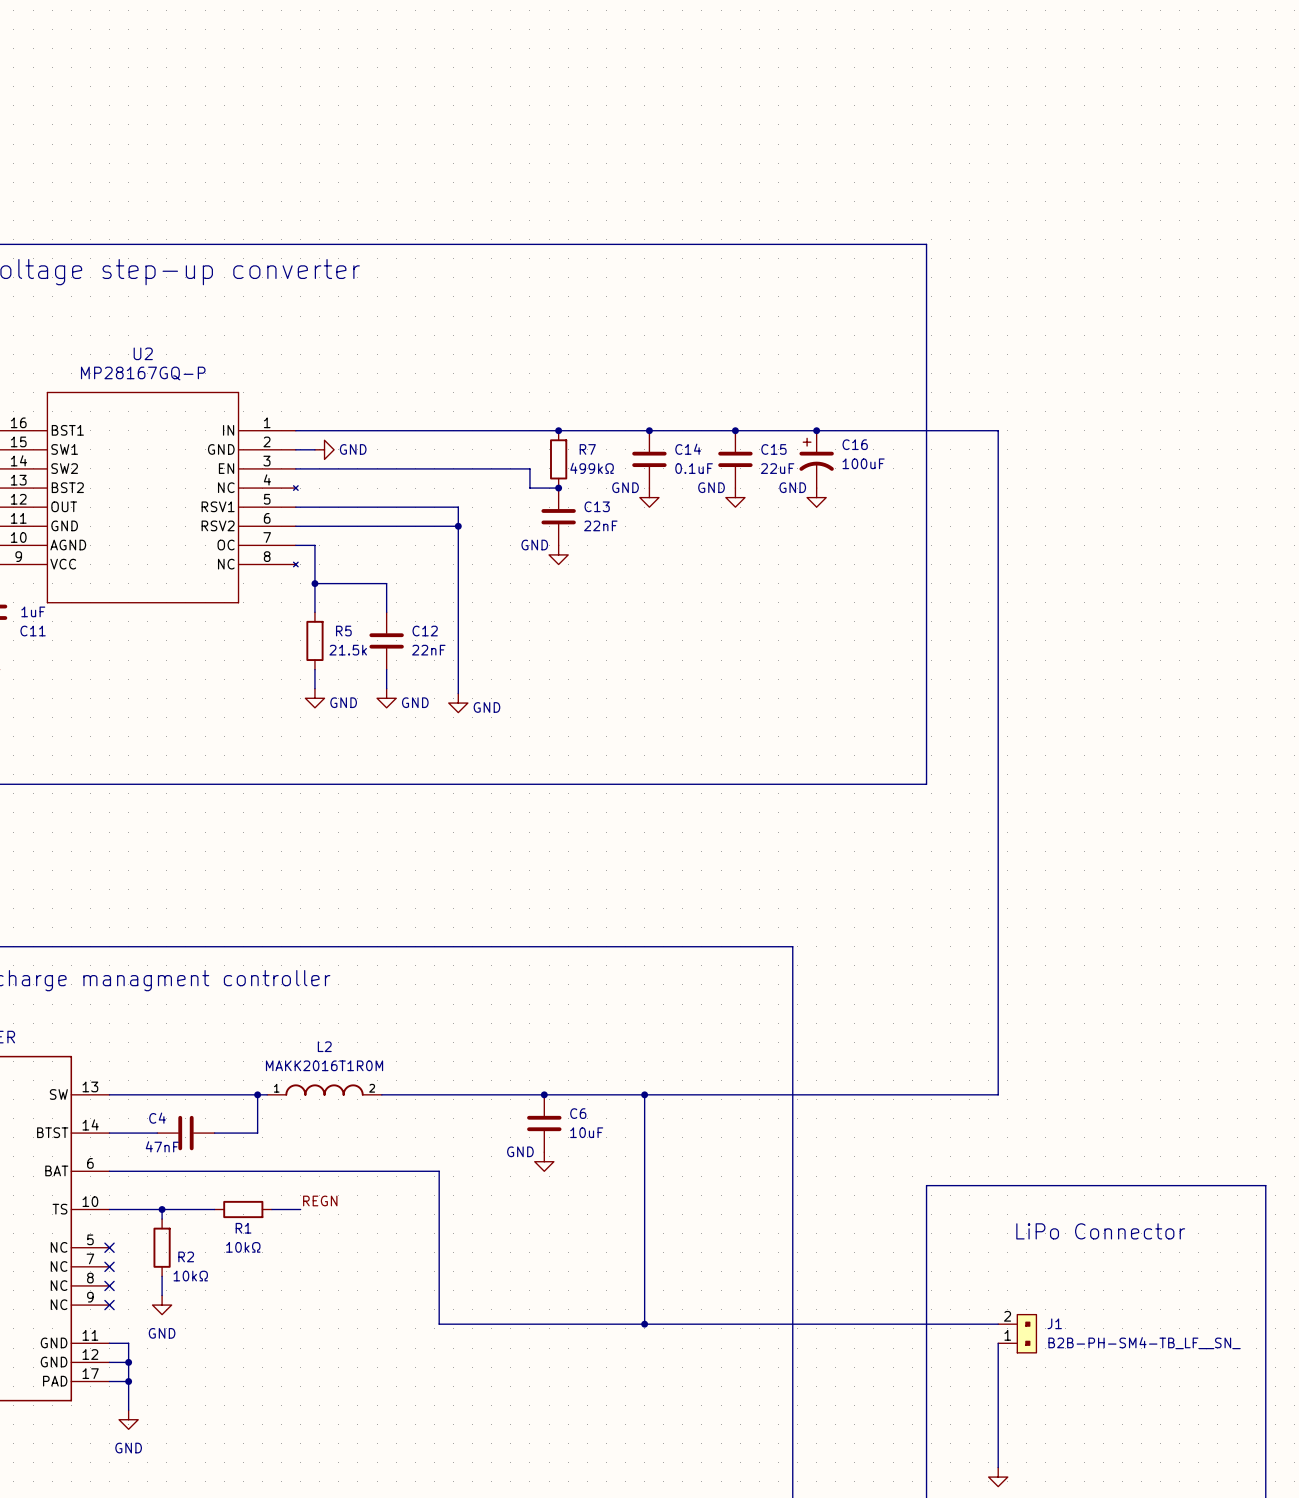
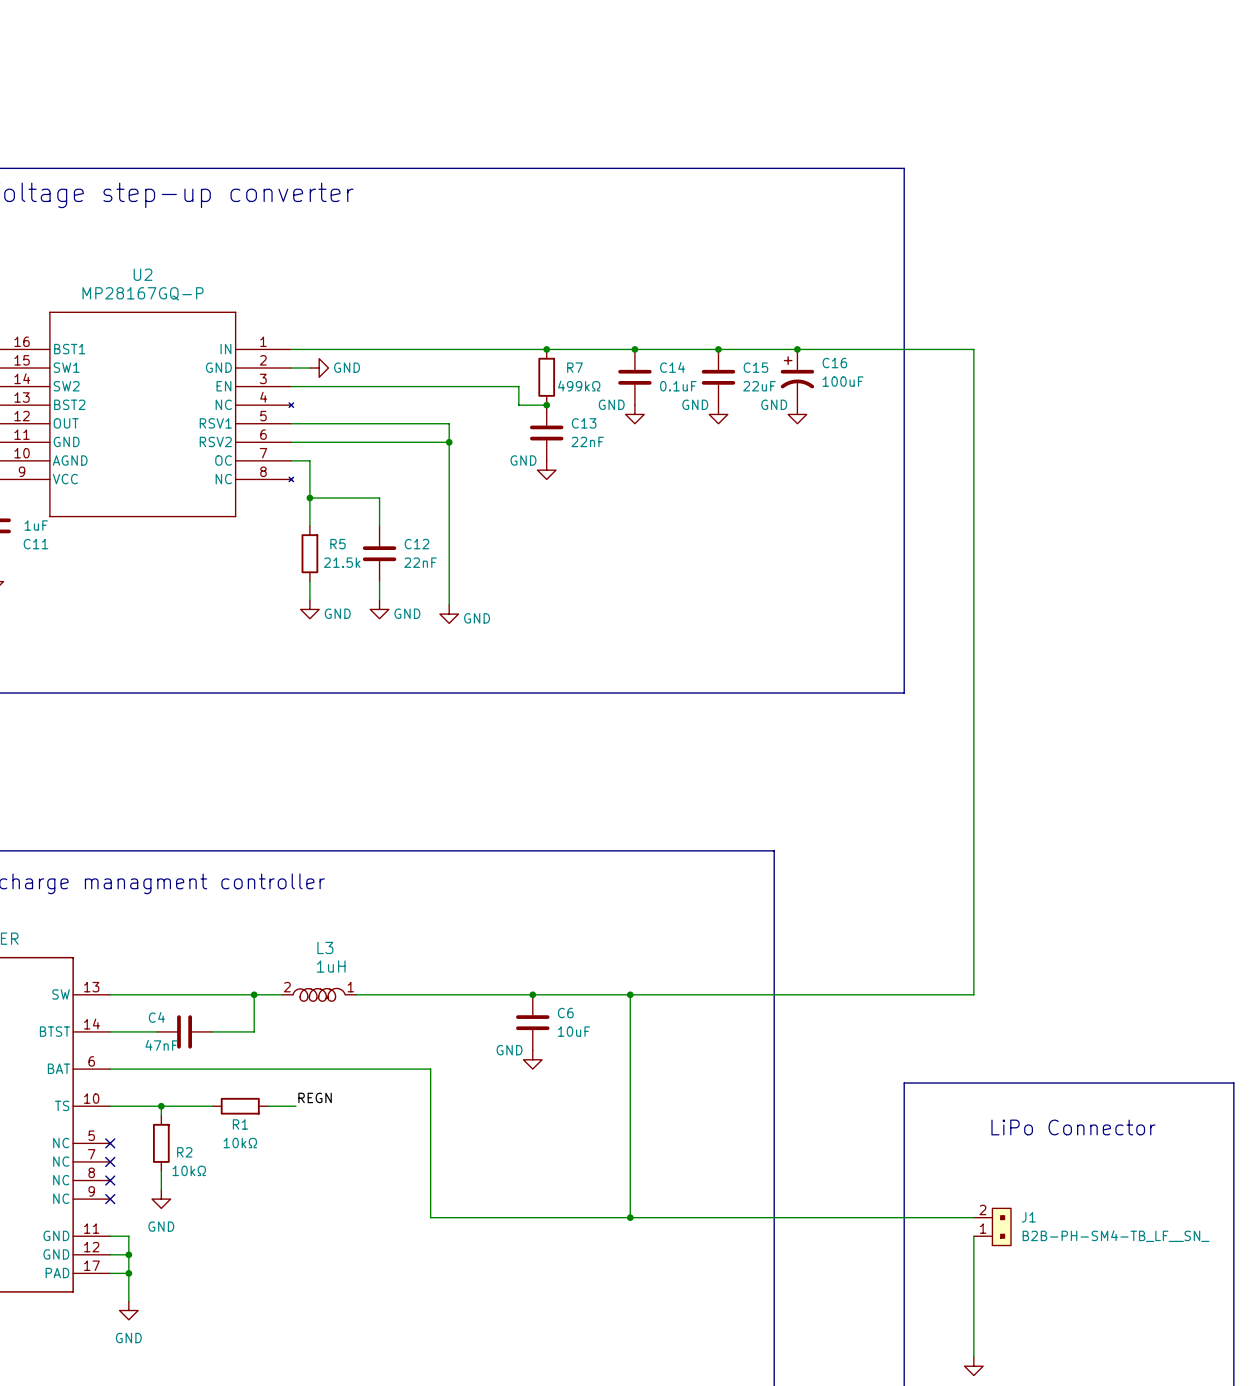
L2: MAKK2016T1R0M (324, 1090) -> none
L3: none -> 1uH (319, 994)

